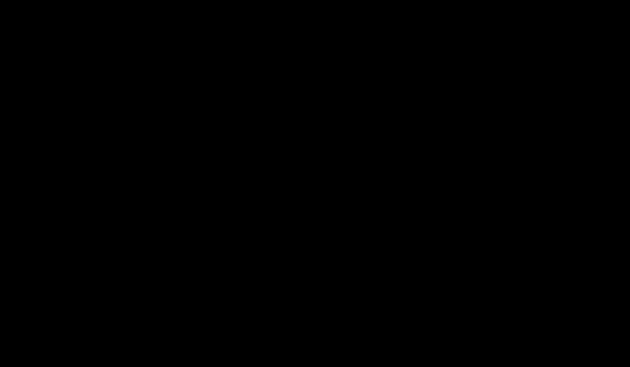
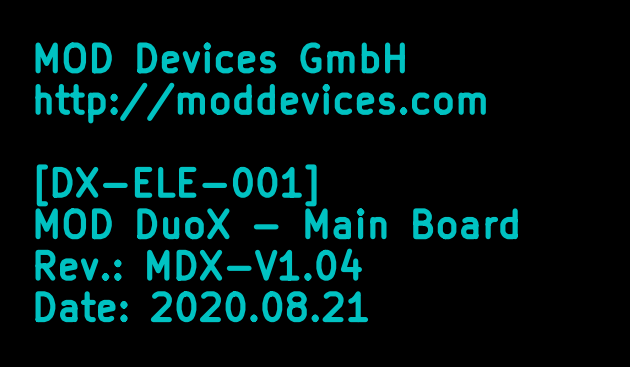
text: none -> MOD Devices GmbH (220, 57)
text: none -> http://moddevices.com (260, 103)
text: none -> [DX-ELE-001] (176, 185)
text: none -> MOD DuoX - Main Board (276, 223)
text: none -> Rev.: MDX-V1.04 (198, 264)
text: none -> Date: 2020.08.21 (201, 306)

